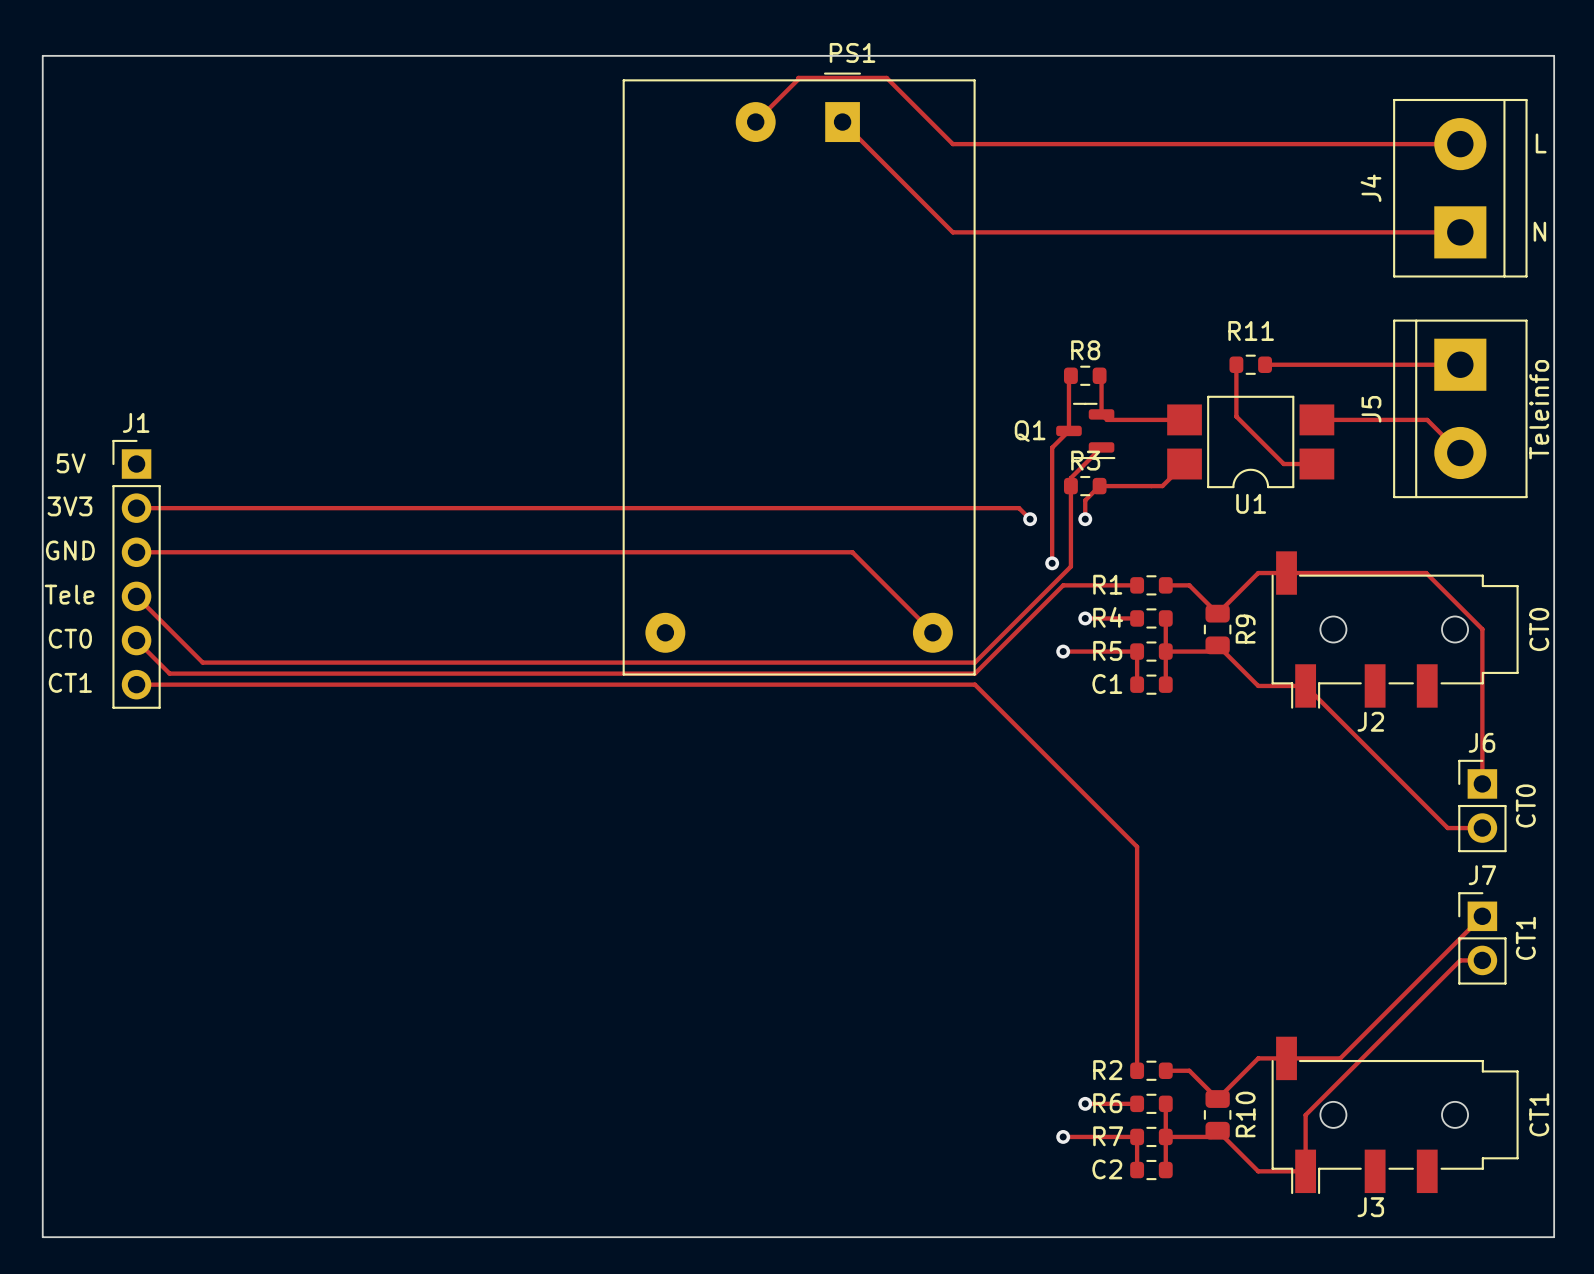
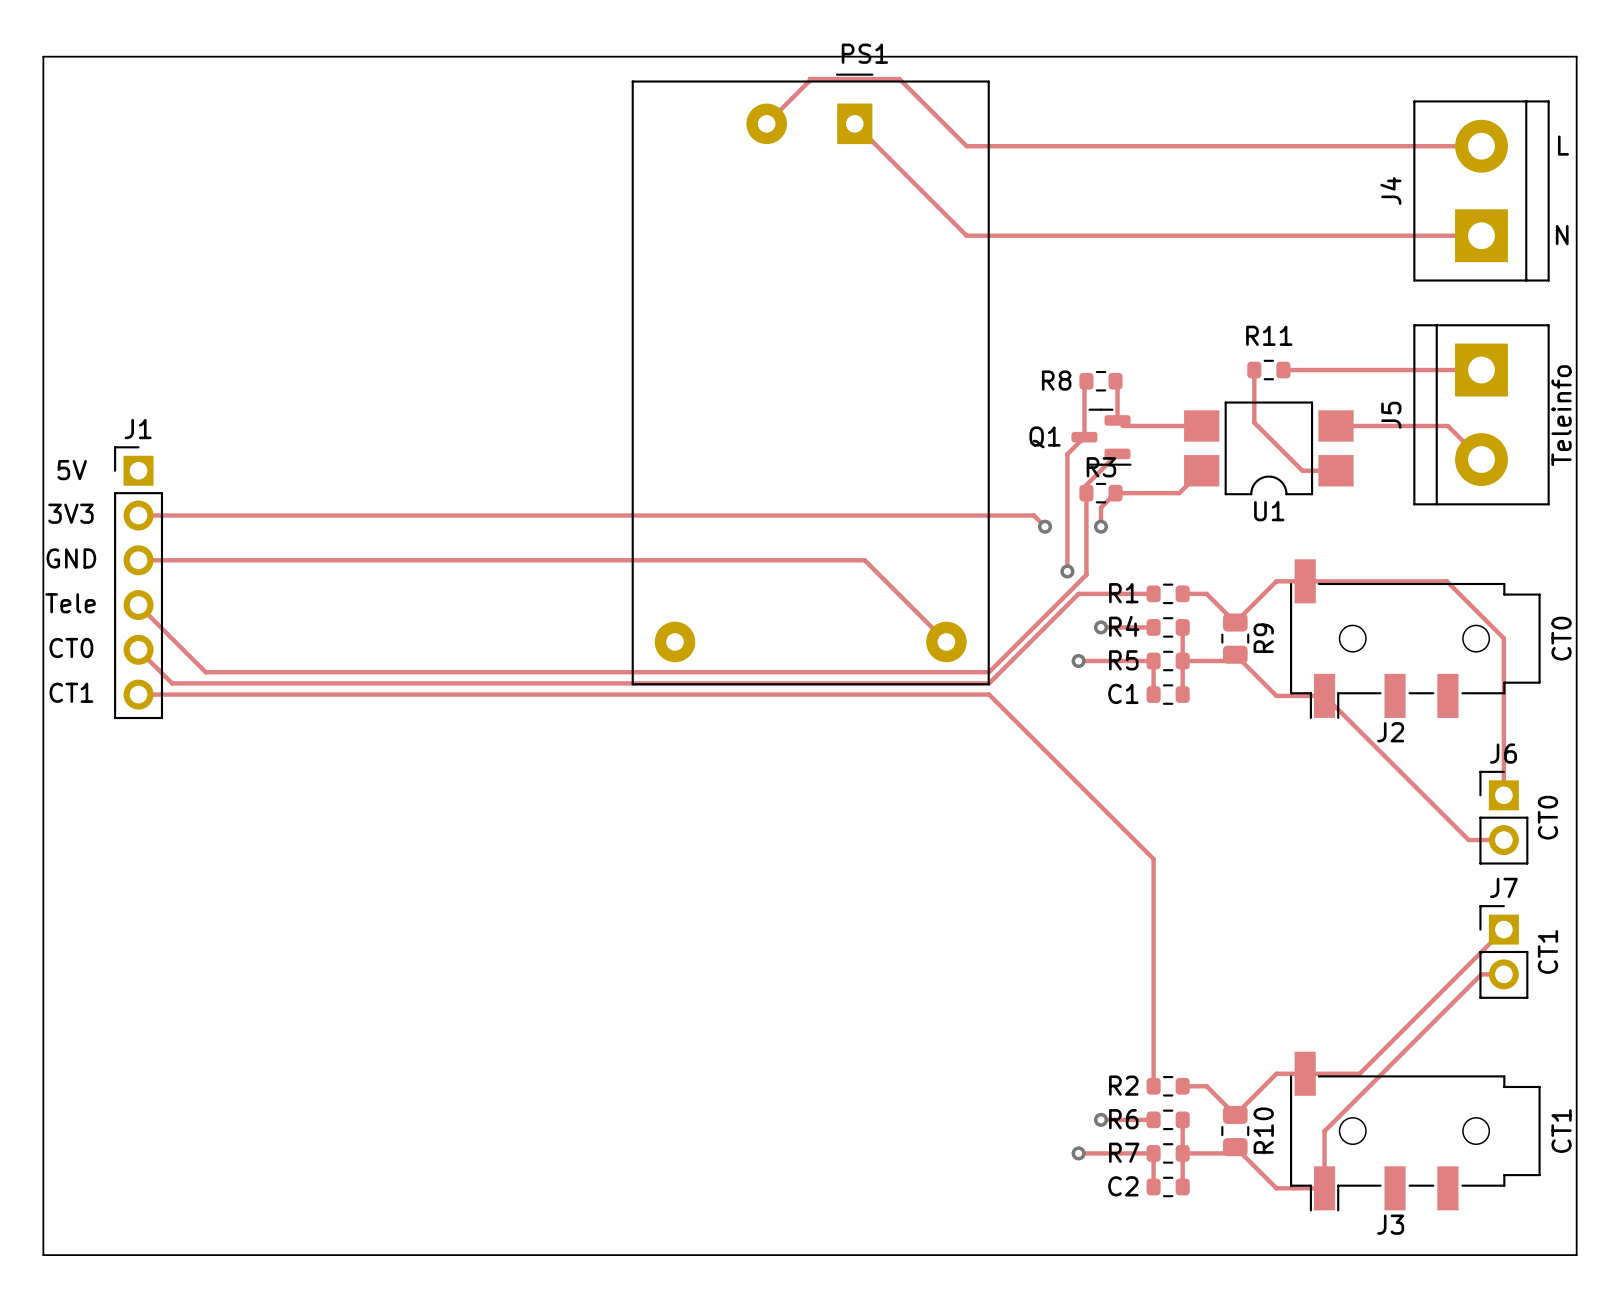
R8 name position: R8 (1085, 350) -> R8 (1056, 380)

